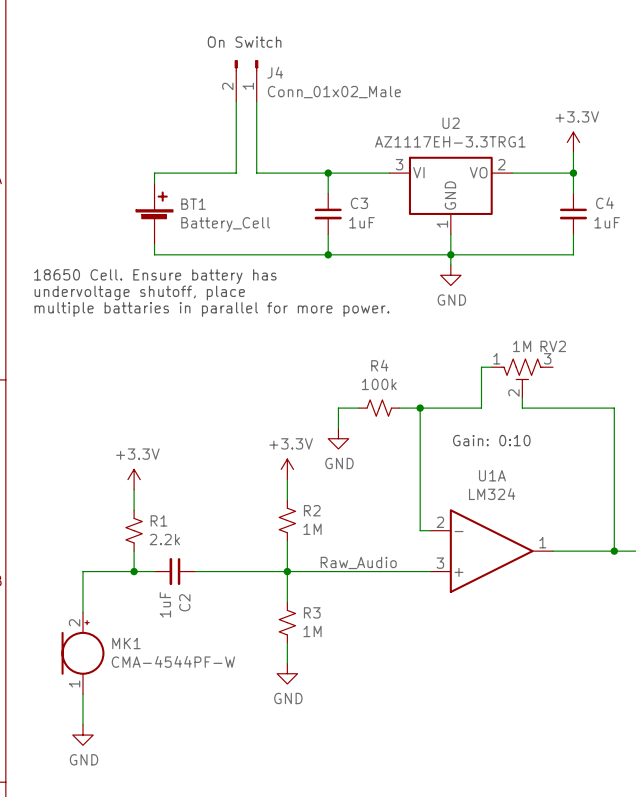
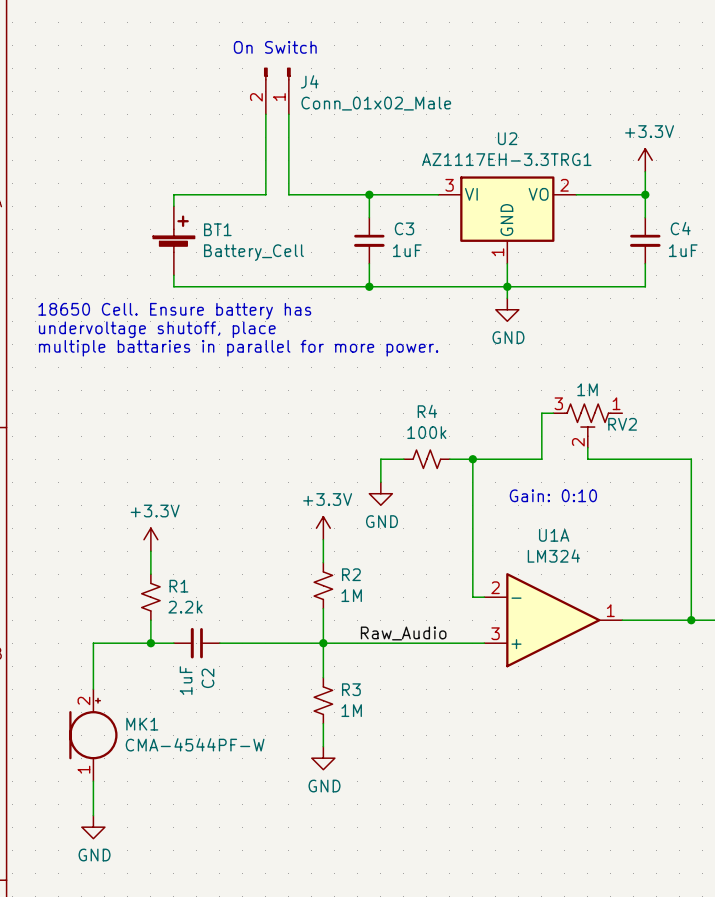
RV2 name position: RV2 (553, 346) -> RV2 (622, 424)
RV2 flip: as is (522, 373) -> left-right (587, 420)

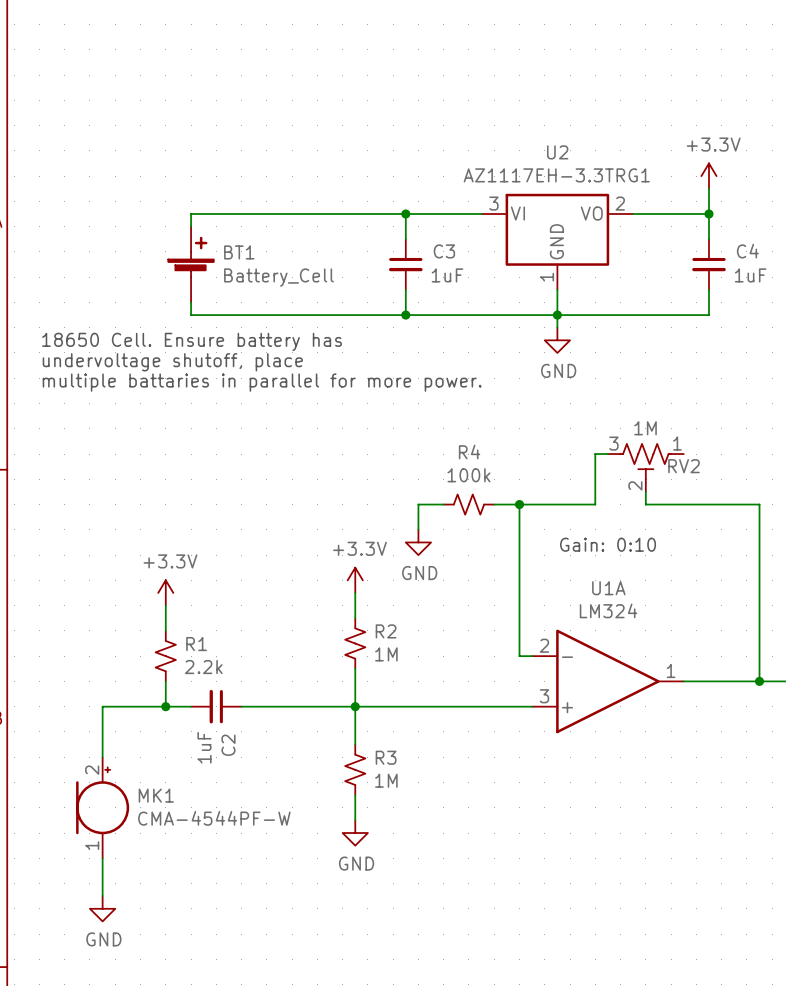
text: On Switch (275, 47) -> none
J4: Conn_01x02_Male (277, 90) -> none
wire: (265, 114) (265, 194) -> (317, 214) (292, 214)
wire: (288, 114) (288, 194) -> none
label: Raw_Audio (403, 633) -> none

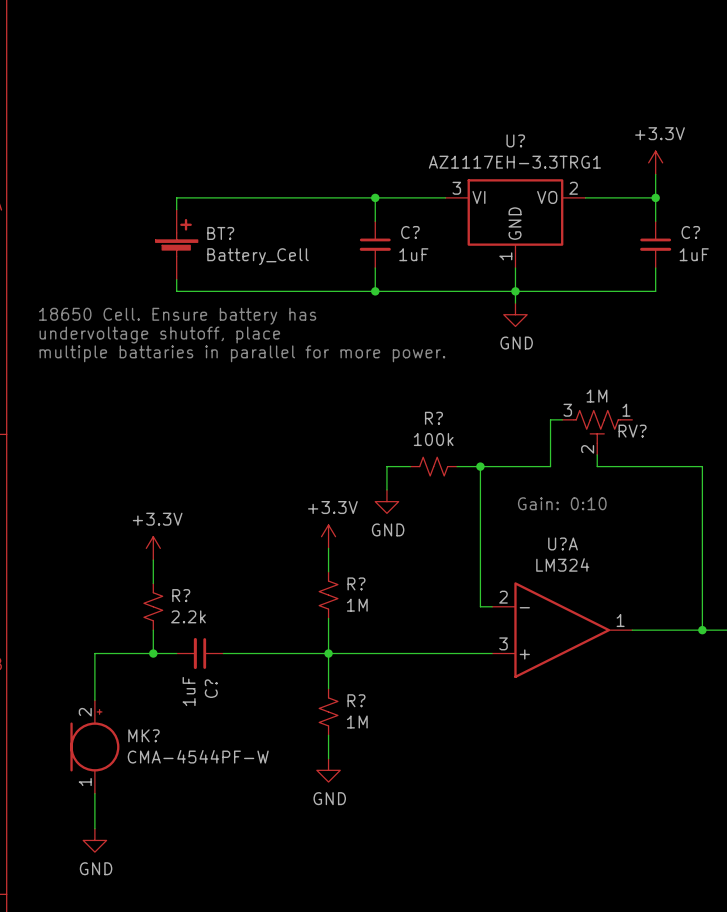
U2 name: U2 (557, 152) -> U? (515, 140)
C3 name: C3 (444, 251) -> C? (410, 232)
C4 name: C4 (747, 251) -> C? (690, 232)
BT1 name: BT1 (239, 252) -> BT? (220, 233)
R4 name: R4 (469, 451) -> R? (433, 418)
RV2 name: RV2 (684, 466) -> RV? (632, 431)
U1A name: U1A (608, 588) -> U?A (563, 543)
R2 name: R2 (386, 631) -> R? (356, 583)
R1 name: R1 (196, 644) -> R? (181, 595)
C2 name: C2 (228, 745) -> C? (211, 688)
R3 name: R3 (386, 757) -> R? (356, 700)
MK1 name: MK1 (156, 795) -> MK? (144, 735)

